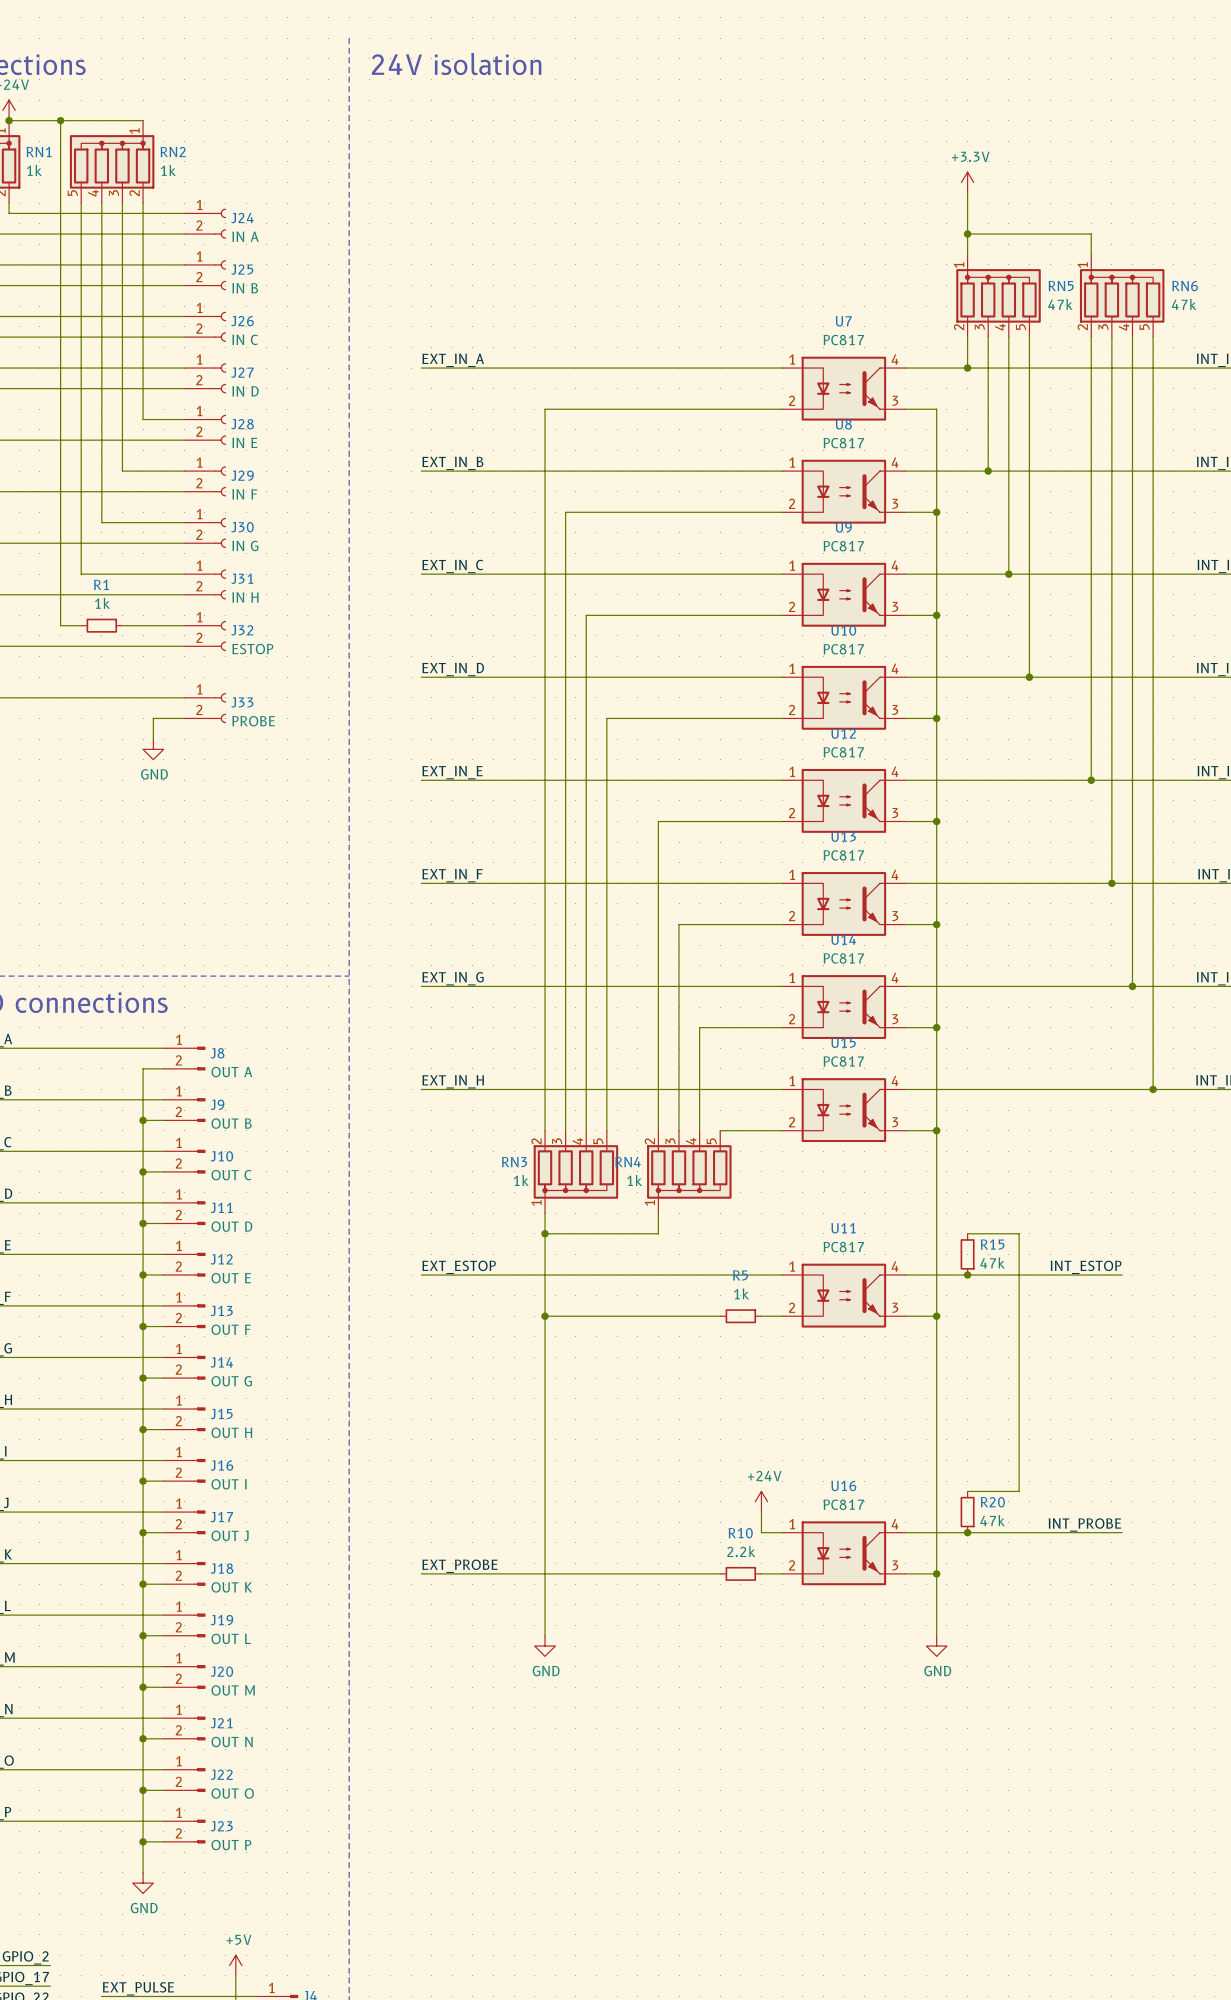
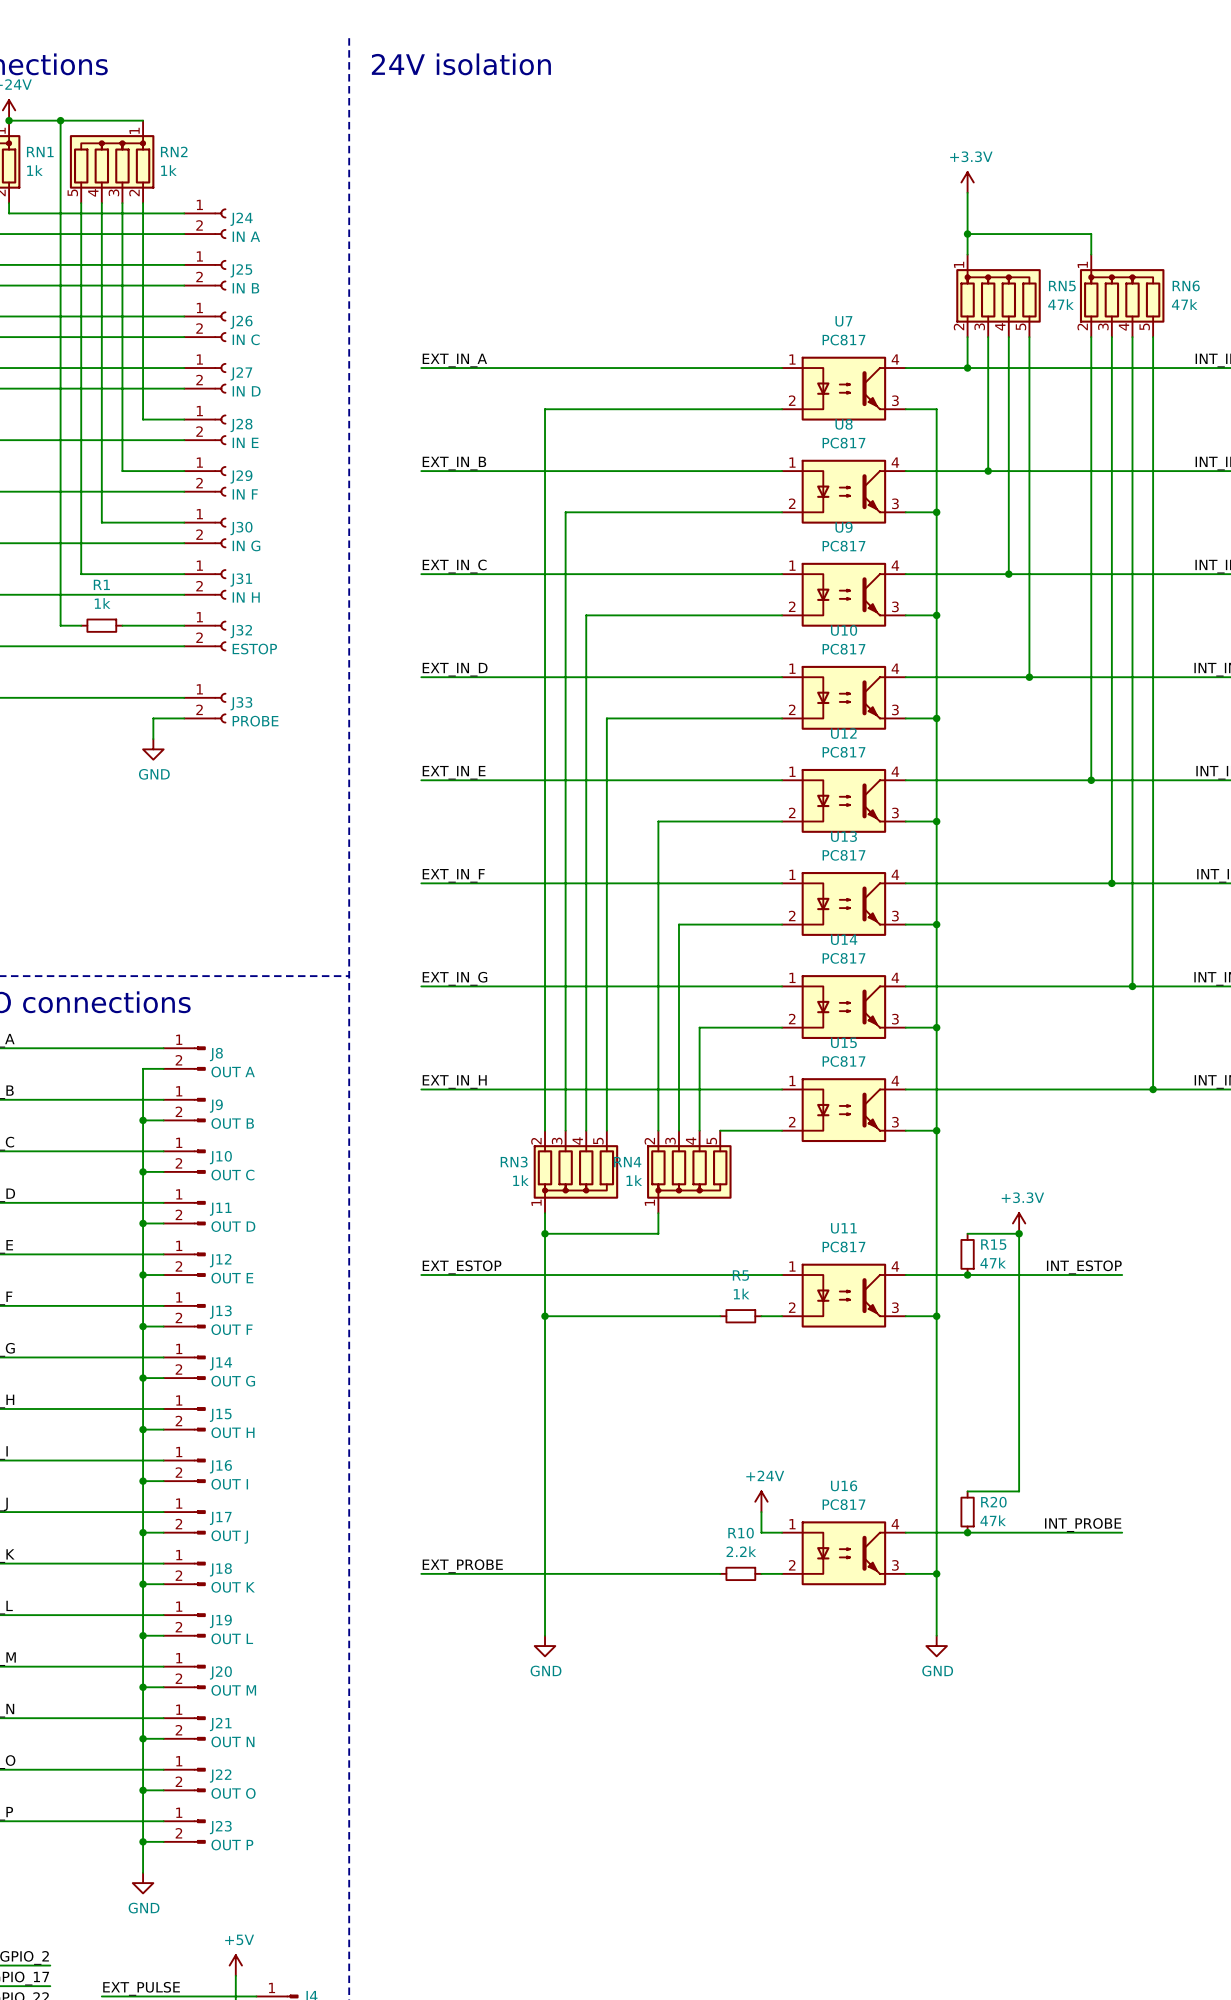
power symbol: none -> +3.3V (1019, 1223)
junction: none -> (1019, 1233)

